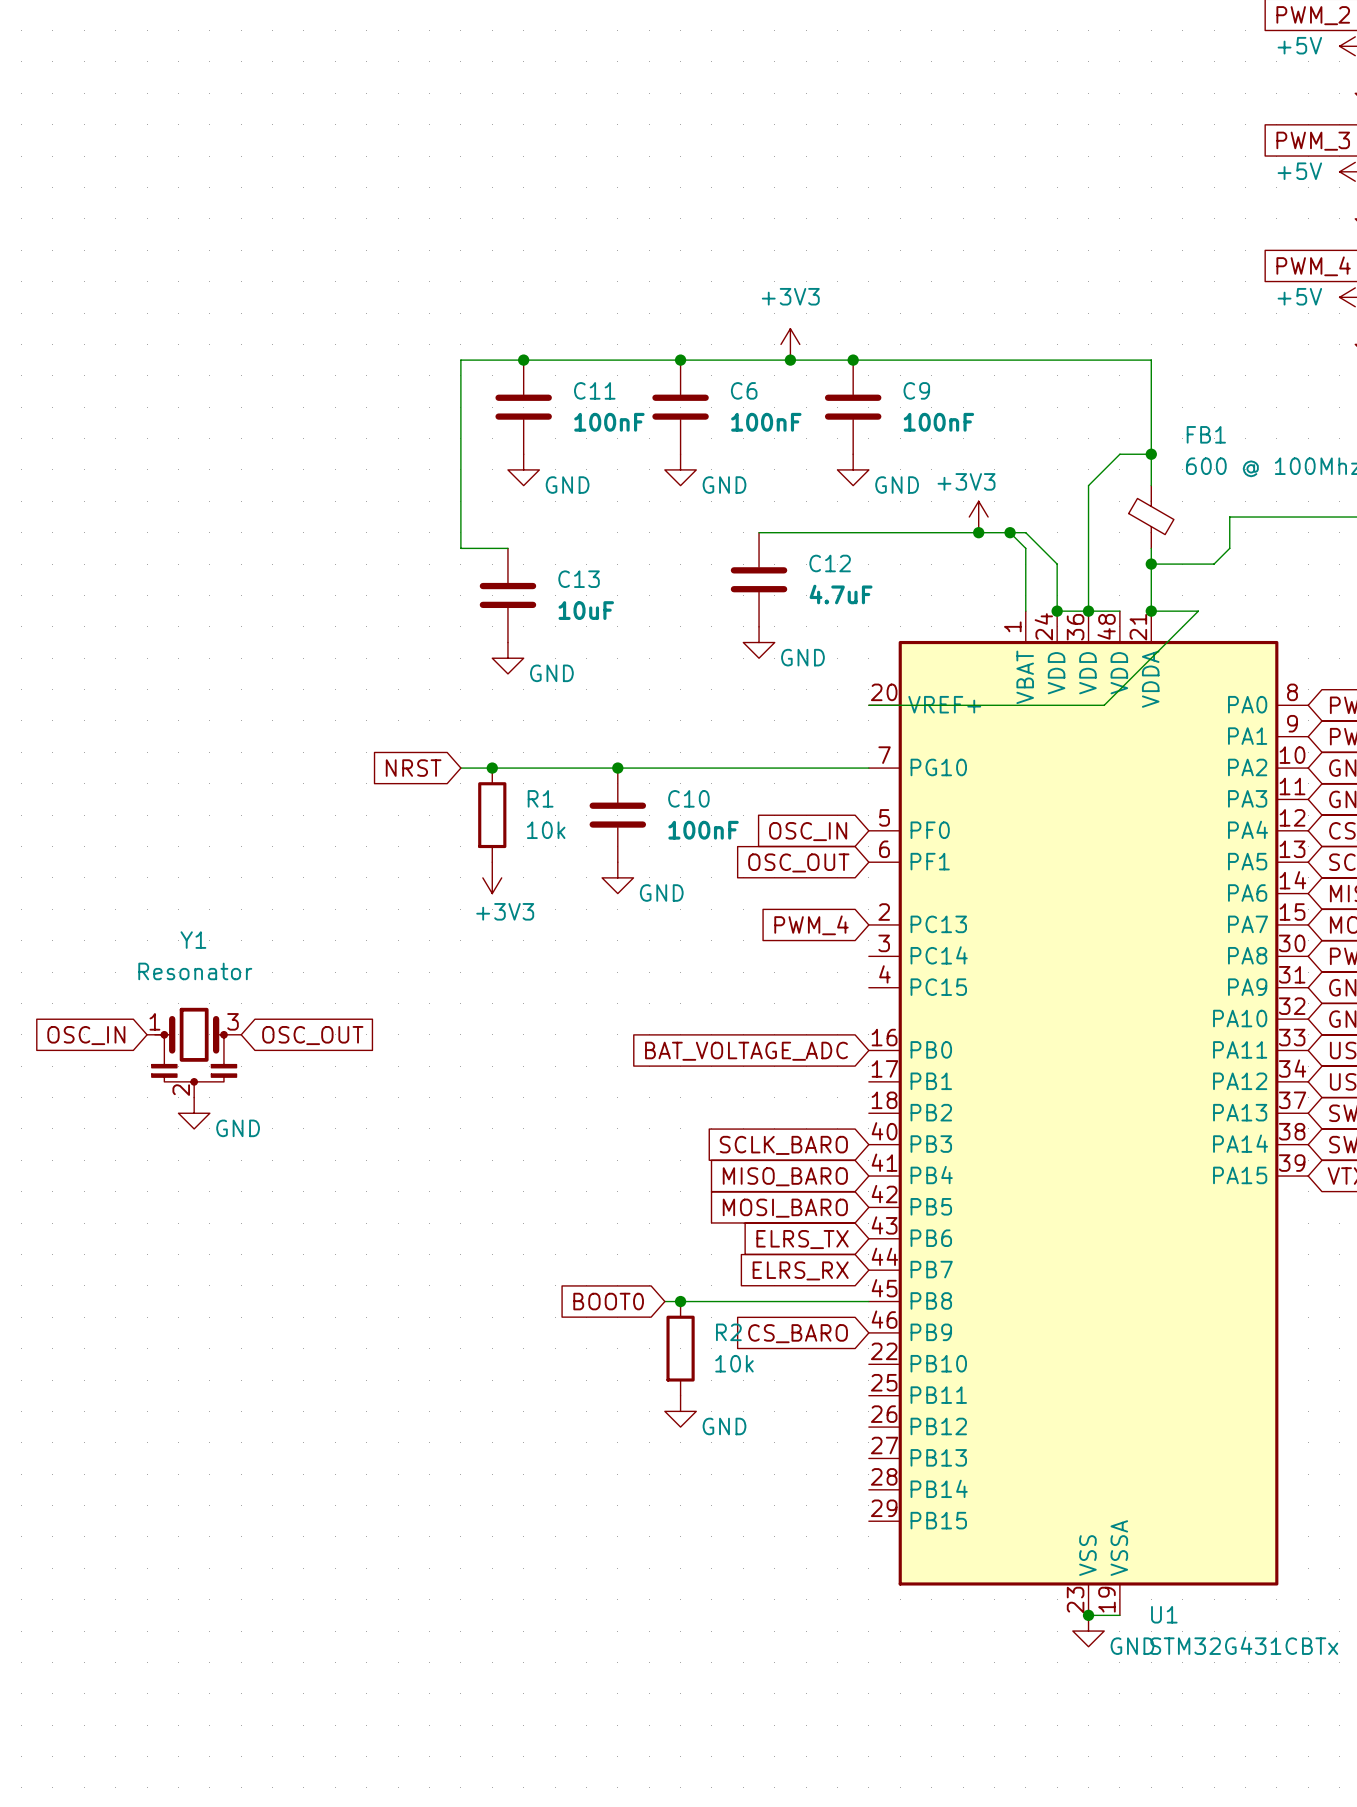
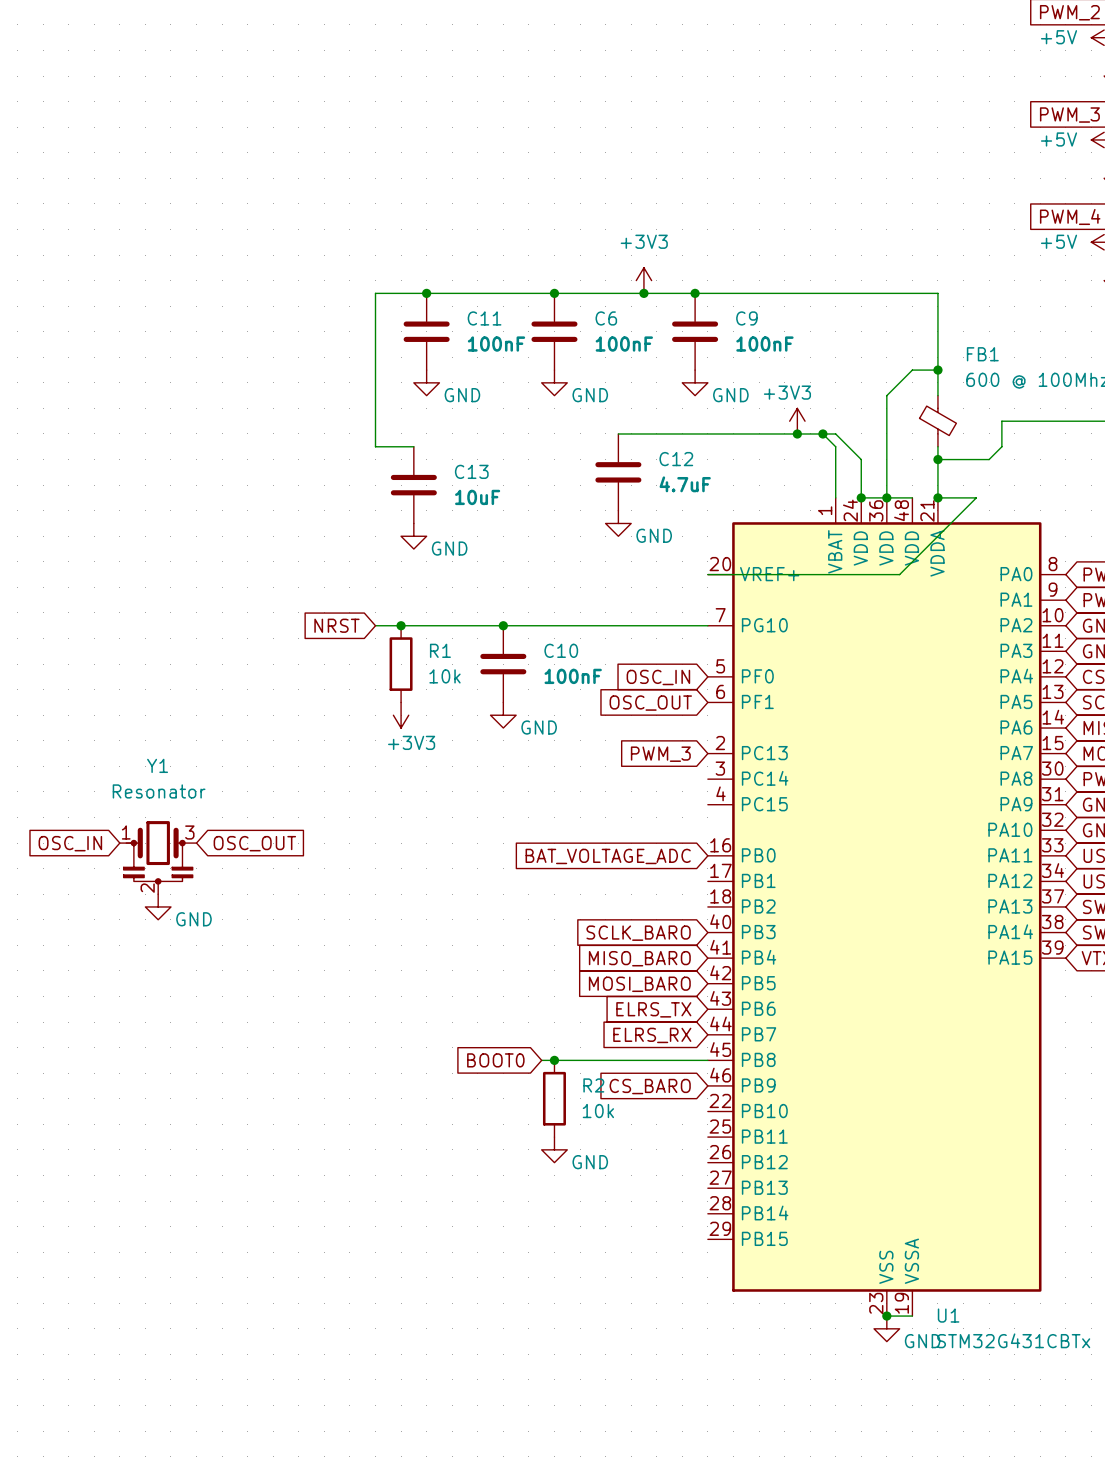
global label: PWM_4 (811, 925) -> PWM_3 (660, 754)

